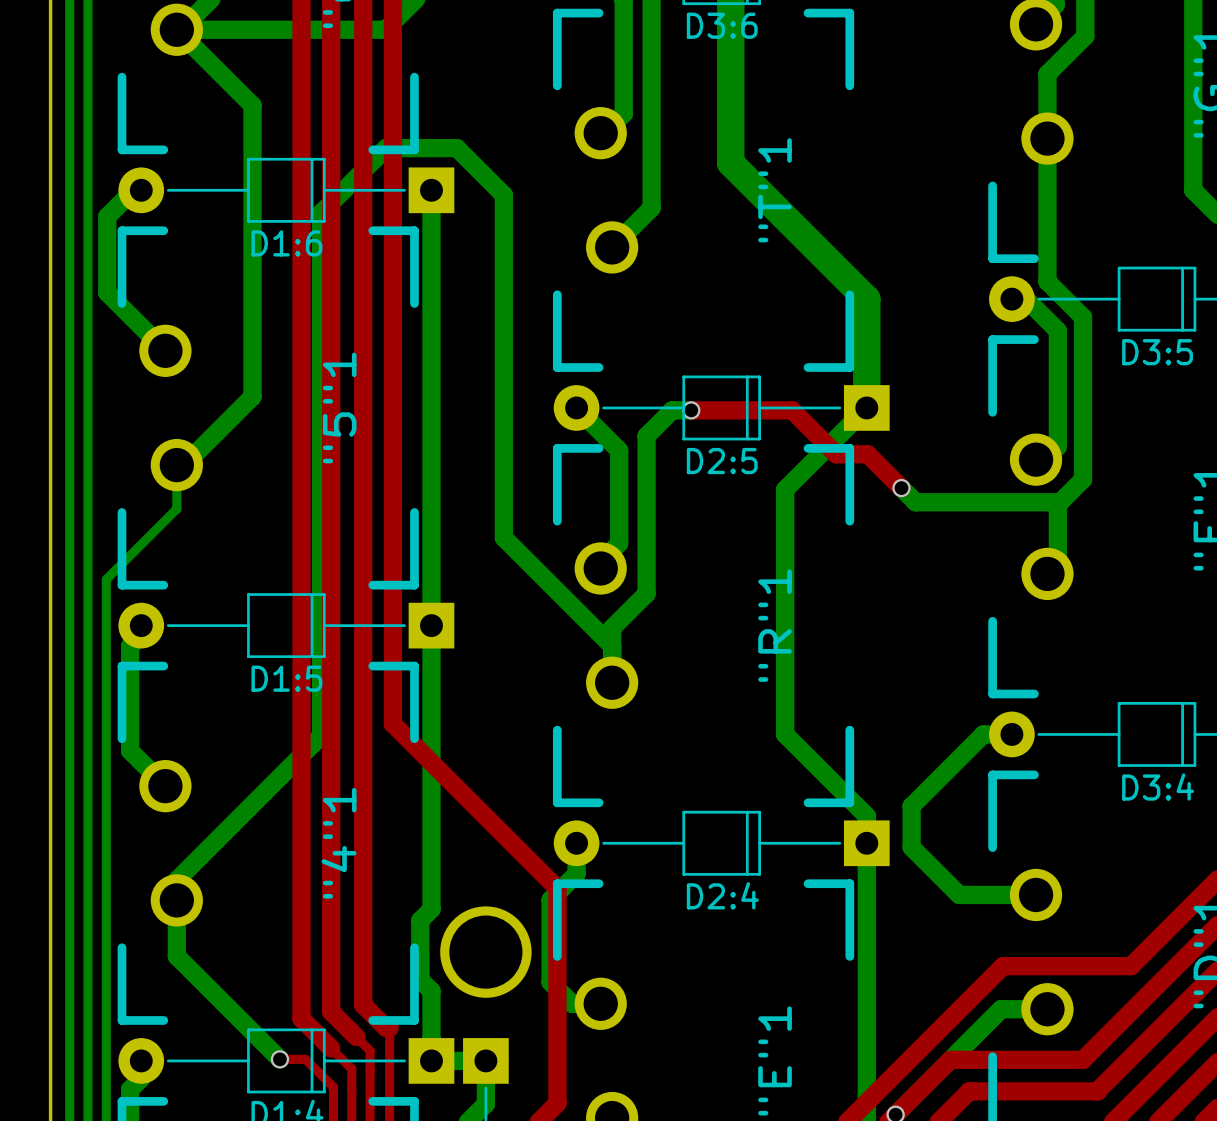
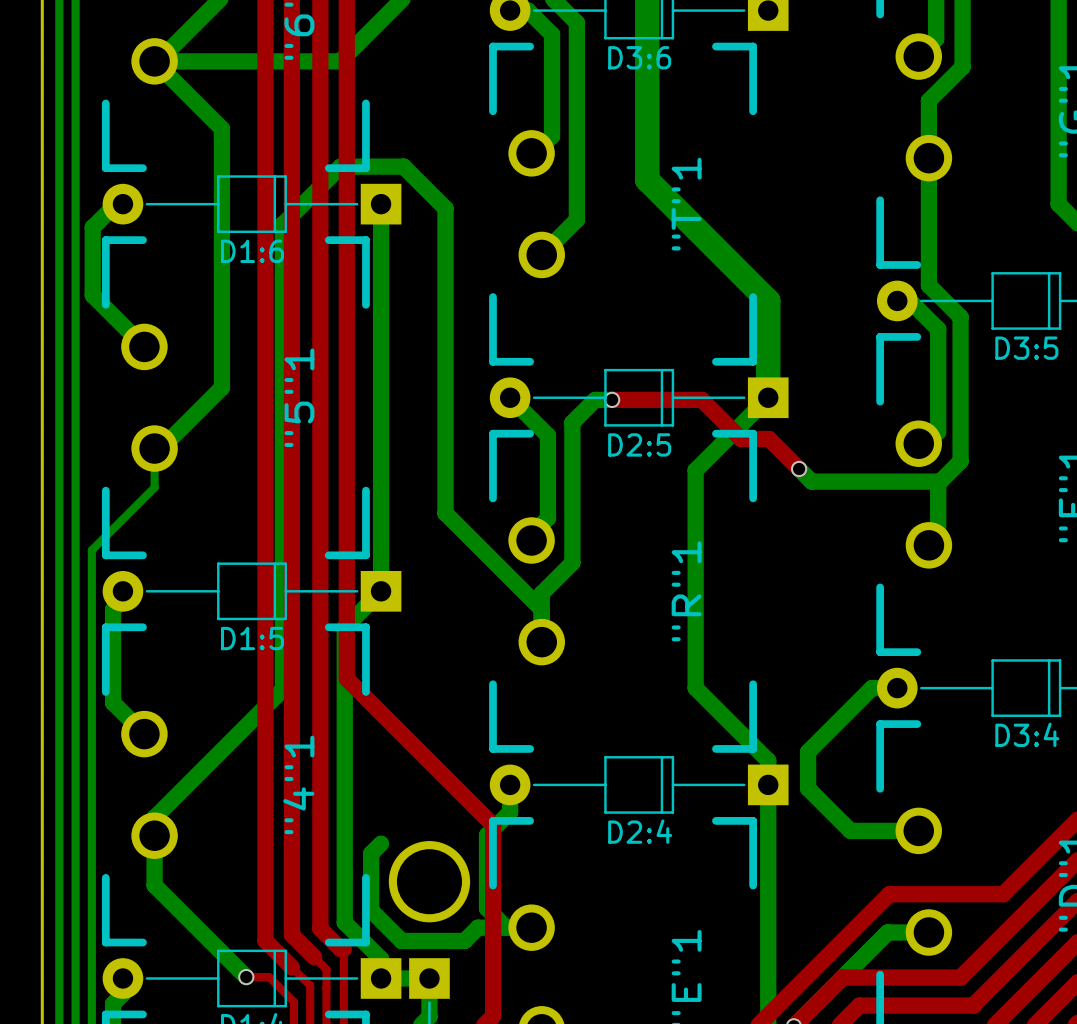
bottom track: (431, 625) (431, 909) -> (381, 591) (344, 627) (344, 922) (381, 958)
bottom track: (420, 979) (431, 991) (431, 1039) -> (371, 906) (371, 910) (401, 940) (464, 940) (477, 927) (506, 927)

